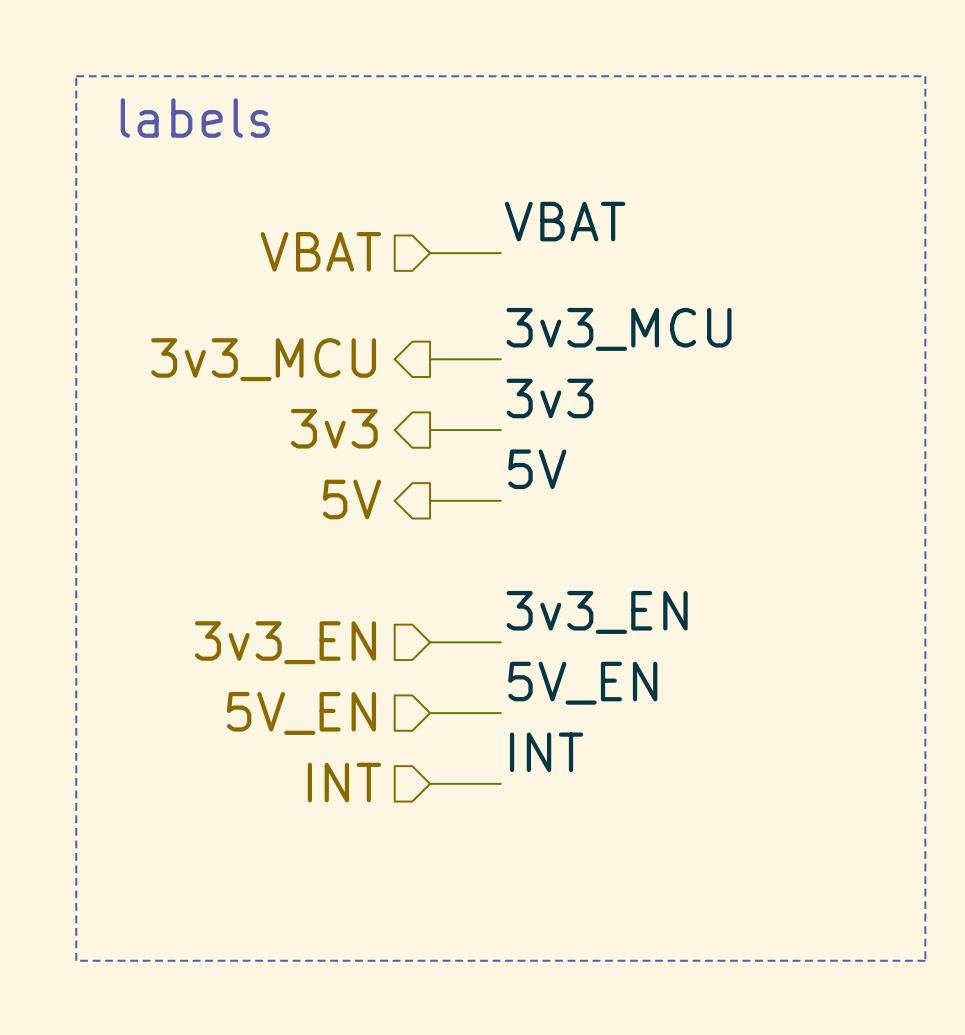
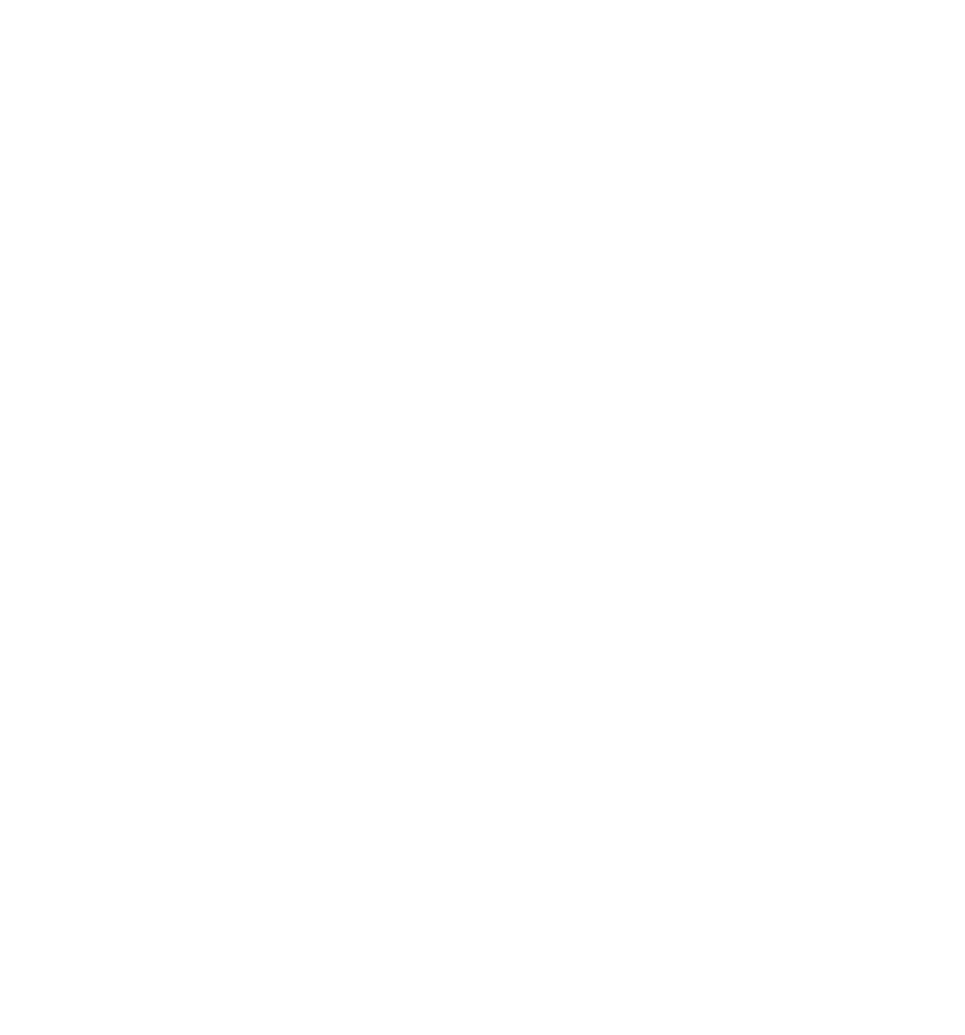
line: (76, 76) (925, 76) (925, 960) (76, 960) (76, 76) -> none
text: labels (195, 118) -> none
label: VBAT (565, 221) -> none
hierarchical label: VBAT (320, 251) -> none
wire: (430, 253) (500, 253) -> none
label: 3v3_MCU (619, 329) -> none
hierarchical label: 3v3_MCU (263, 359) -> none
wire: (430, 359) (500, 359) -> none
label: 3v3 (549, 398) -> none
hierarchical label: 3v3 (334, 428) -> none
wire: (430, 430) (500, 430) -> none
label: 5V (537, 469) -> none
hierarchical label: 5V (352, 499) -> none
wire: (430, 500) (500, 500) -> none
label: 3v3_EN (597, 612) -> none
hierarchical label: 3v3_EN (285, 642) -> none
wire: (430, 642) (500, 642) -> none
label: 5V_EN (582, 683) -> none
hierarchical label: 5V_EN (301, 713) -> none
wire: (430, 713) (500, 713) -> none
label: INT (546, 752) -> none
hierarchical label: INT (344, 782) -> none
wire: (430, 783) (500, 783) -> none

